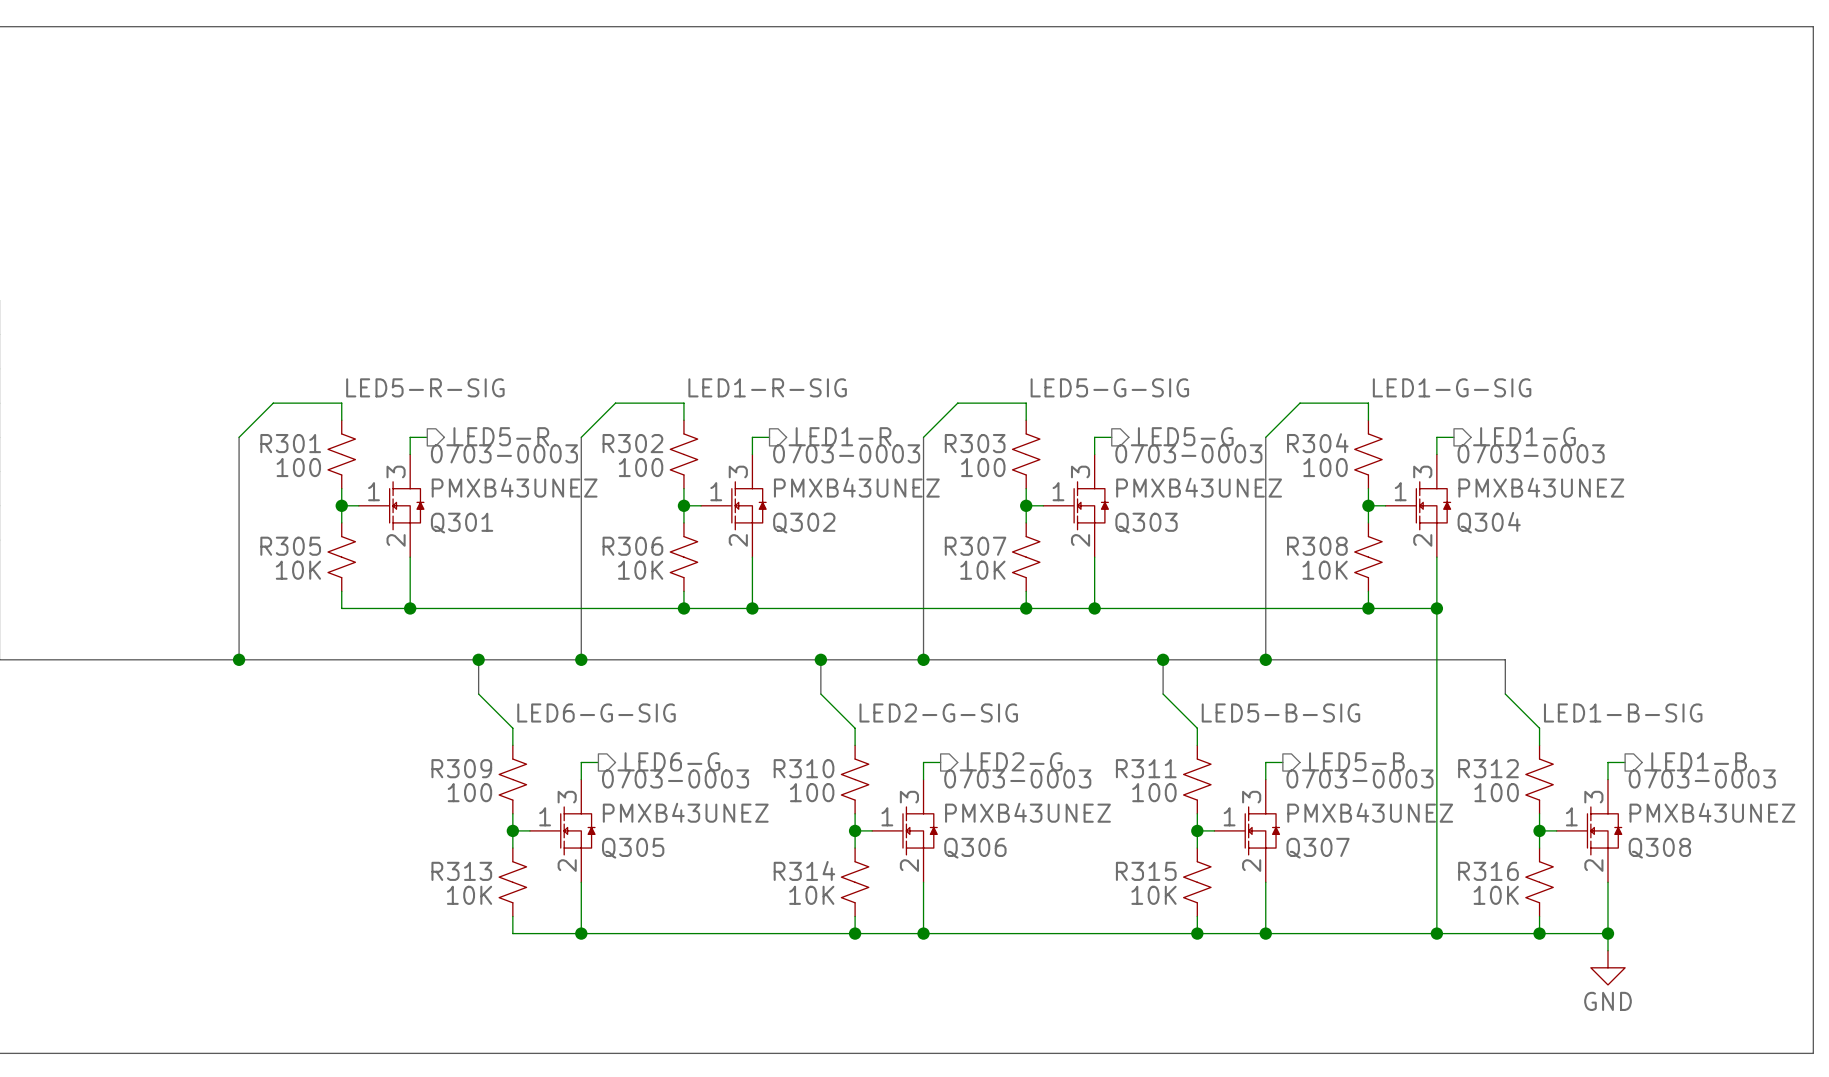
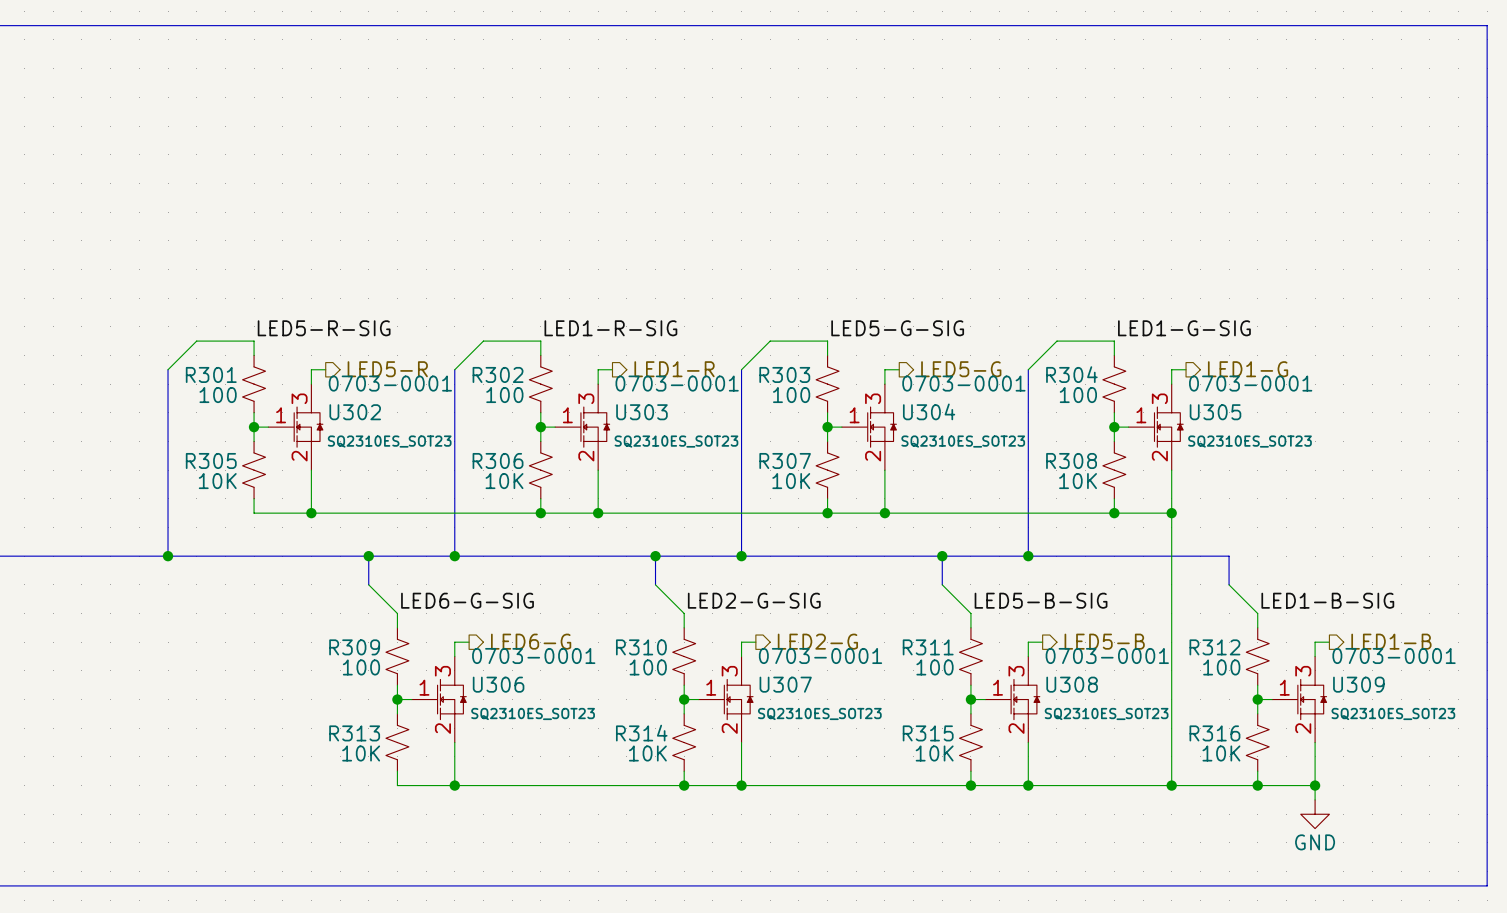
Q301 text: 0703-0003 (504, 453) -> 0703-0001 (390, 383)
Q302 text: 0703-0003 (846, 453) -> 0703-0001 (677, 383)
Q303 text: 0703-0003 (1188, 453) -> 0703-0001 (963, 383)
Q304 text: 0703-0003 (1531, 453) -> 0703-0001 (1250, 383)
Q301 value: PMXB43UNEZ (514, 487) -> SQ2310ES_SOT23 (389, 441)
Q302 value: PMXB43UNEZ (856, 487) -> SQ2310ES_SOT23 (676, 441)
Q303 value: PMXB43UNEZ (1199, 487) -> SQ2310ES_SOT23 (963, 441)
Q304 value: PMXB43UNEZ (1541, 487) -> SQ2310ES_SOT23 (1250, 441)
Q304 name: Q304 (1489, 522) -> U305 (1215, 412)
Q301 name: Q301 (462, 523) -> U302 (355, 412)
Q302 name: Q302 (804, 523) -> U303 (641, 412)
Q303 name: Q303 (1146, 523) -> U304 (929, 411)
Q305 text: 0703-0003 (675, 778) -> 0703-0001 (533, 655)
Q306 text: 0703-0003 (1017, 778) -> 0703-0001 (820, 655)
Q307 text: 0703-0003 (1360, 778) -> 0703-0001 (1107, 655)
Q308 text: 0703-0003 (1702, 778) -> 0703-0001 (1394, 655)
Q305 value: PMXB43UNEZ (685, 812) -> SQ2310ES_SOT23 (533, 713)
Q306 value: PMXB43UNEZ (1027, 812) -> SQ2310ES_SOT23 (819, 713)
Q307 value: PMXB43UNEZ (1370, 812) -> SQ2310ES_SOT23 (1106, 713)
Q308 value: PMXB43UNEZ (1712, 812) -> SQ2310ES_SOT23 (1393, 713)
Q305 name: Q305 (633, 848) -> U306 (498, 684)
Q306 name: Q306 (975, 848) -> U307 (785, 684)
Q307 name: Q307 (1318, 848) -> U308 (1072, 684)
Q308 name: Q308 (1659, 848) -> U309 (1358, 684)

